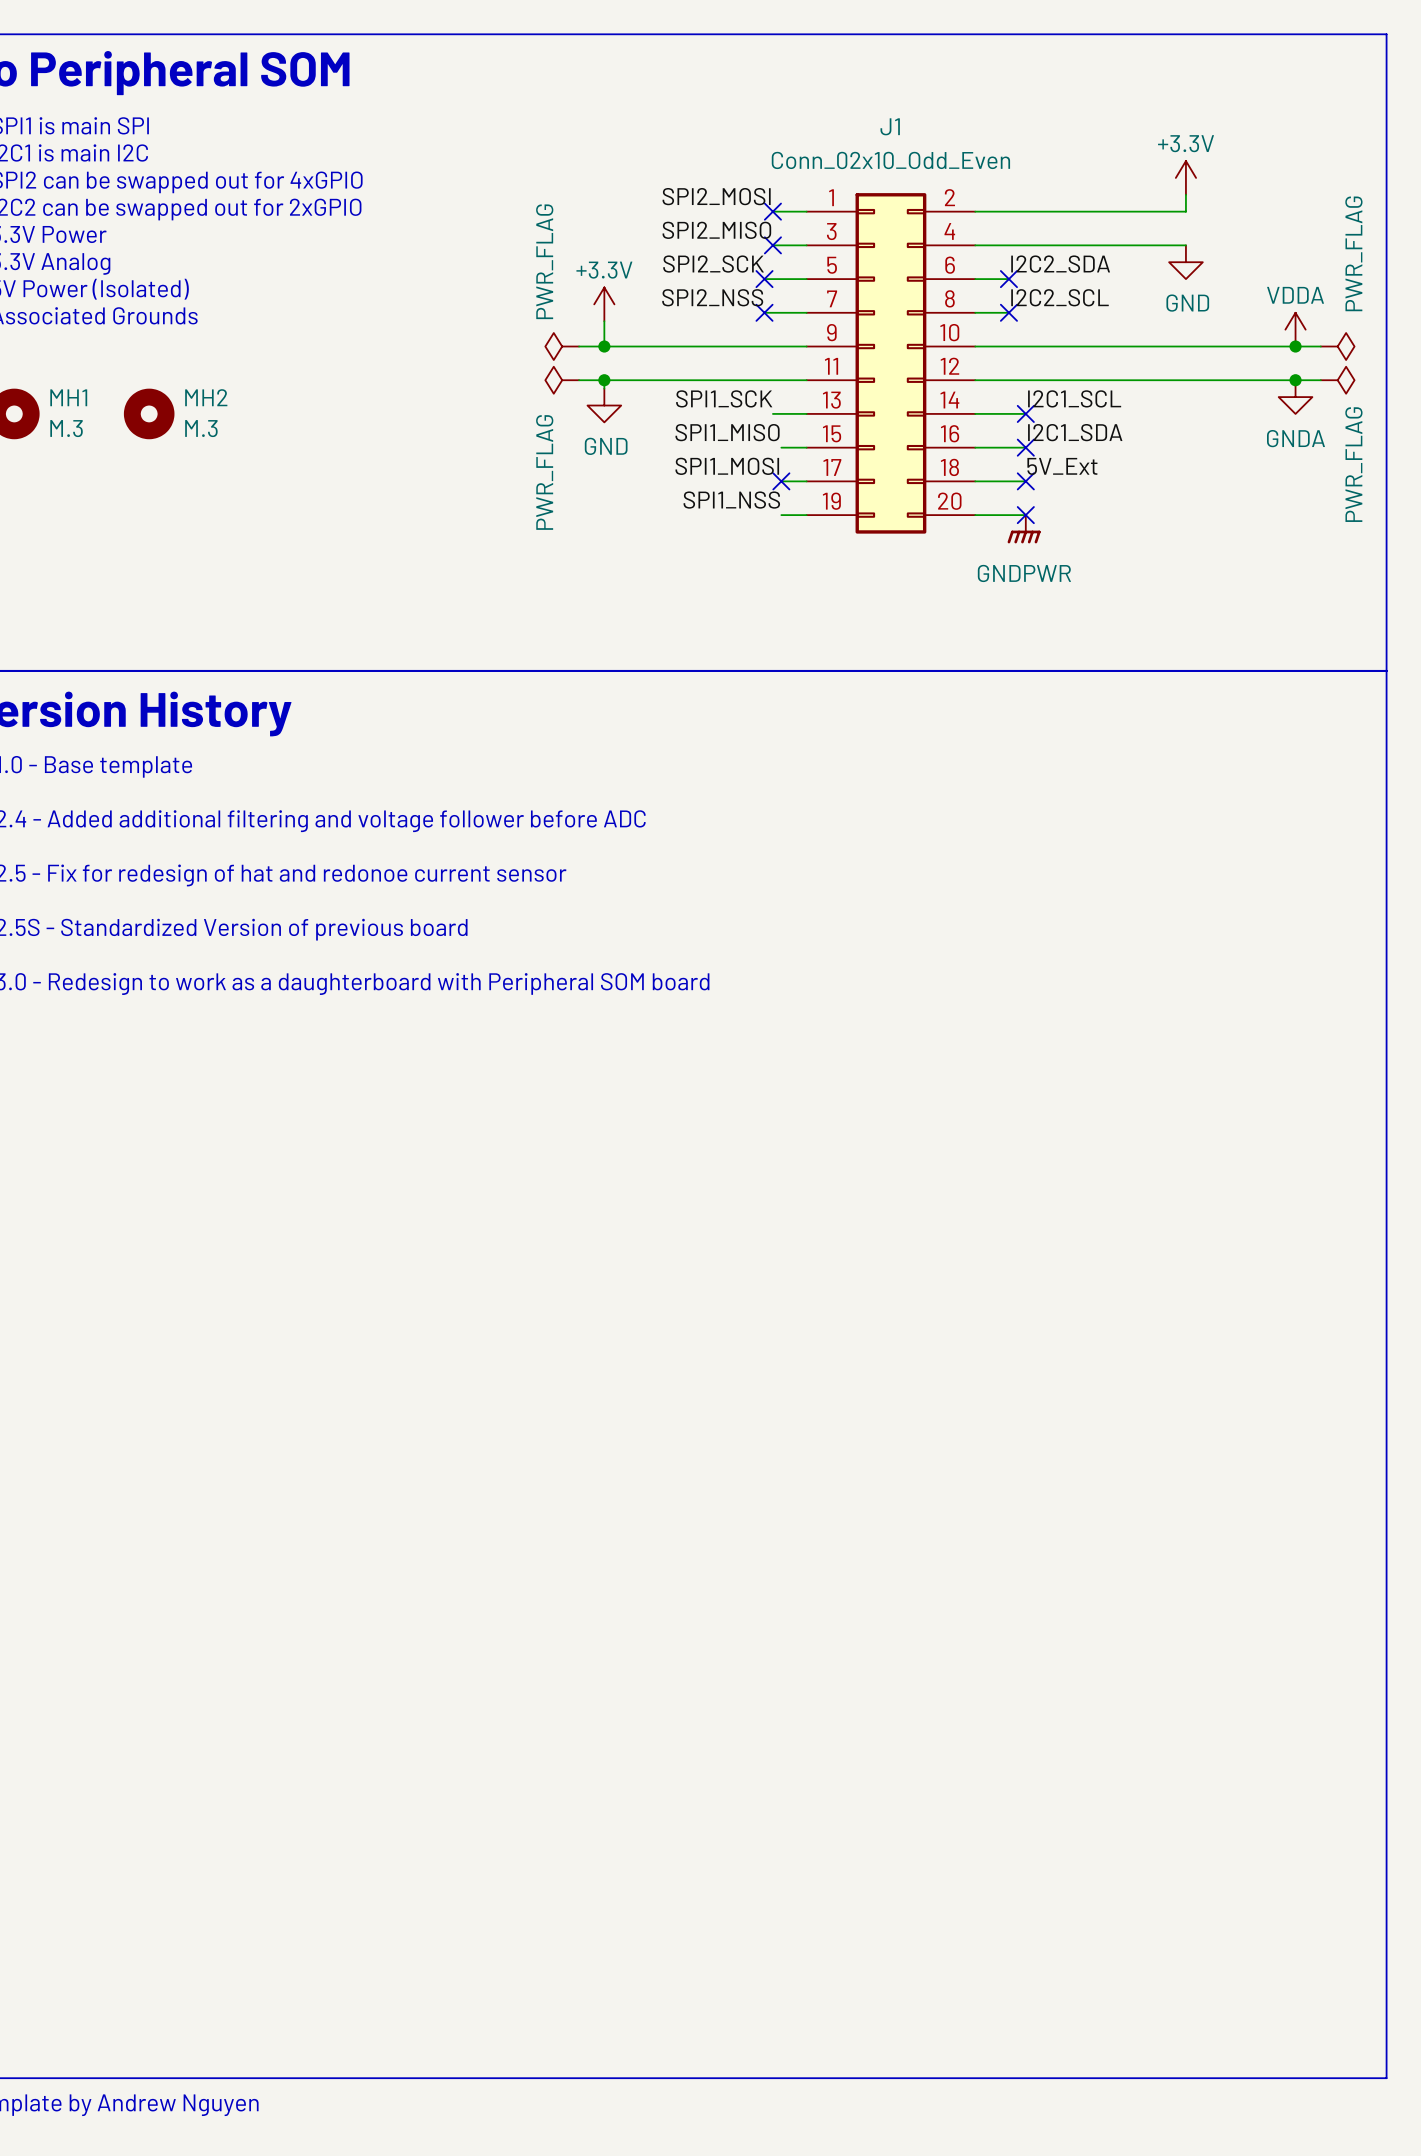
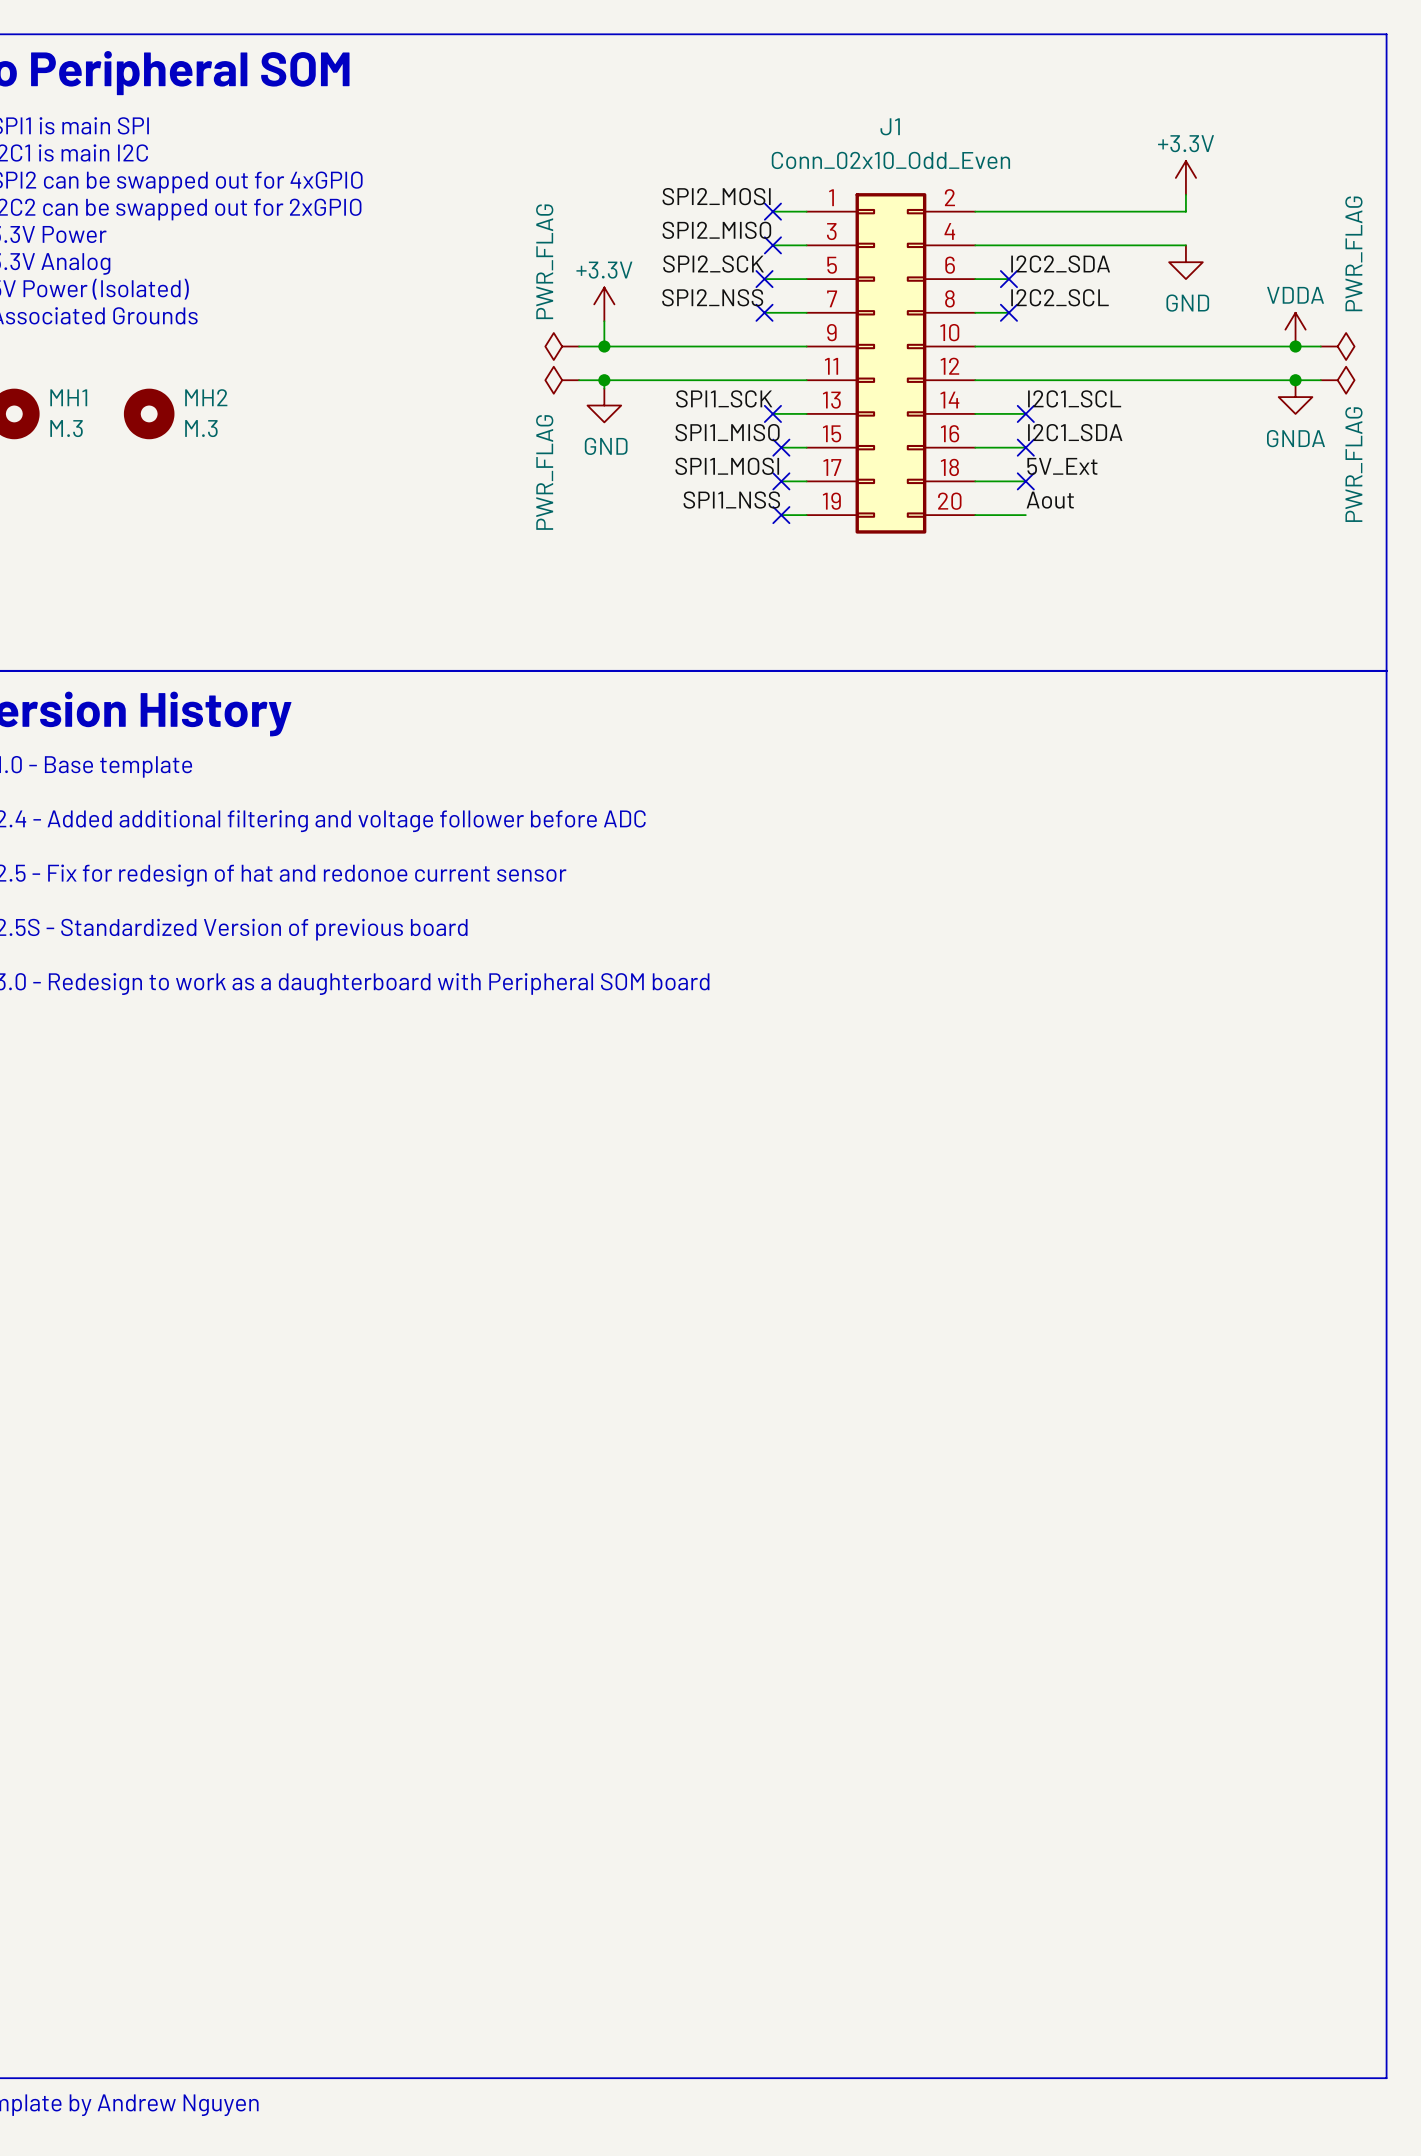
no-connect mark: none -> (772, 413)
no-connect mark: none -> (781, 447)
label: none -> Aout (1050, 500)
no-connect mark: none -> (781, 515)
no-connect mark: (1025, 515) -> none
power symbol: GNDPWR (1024, 529) -> none

